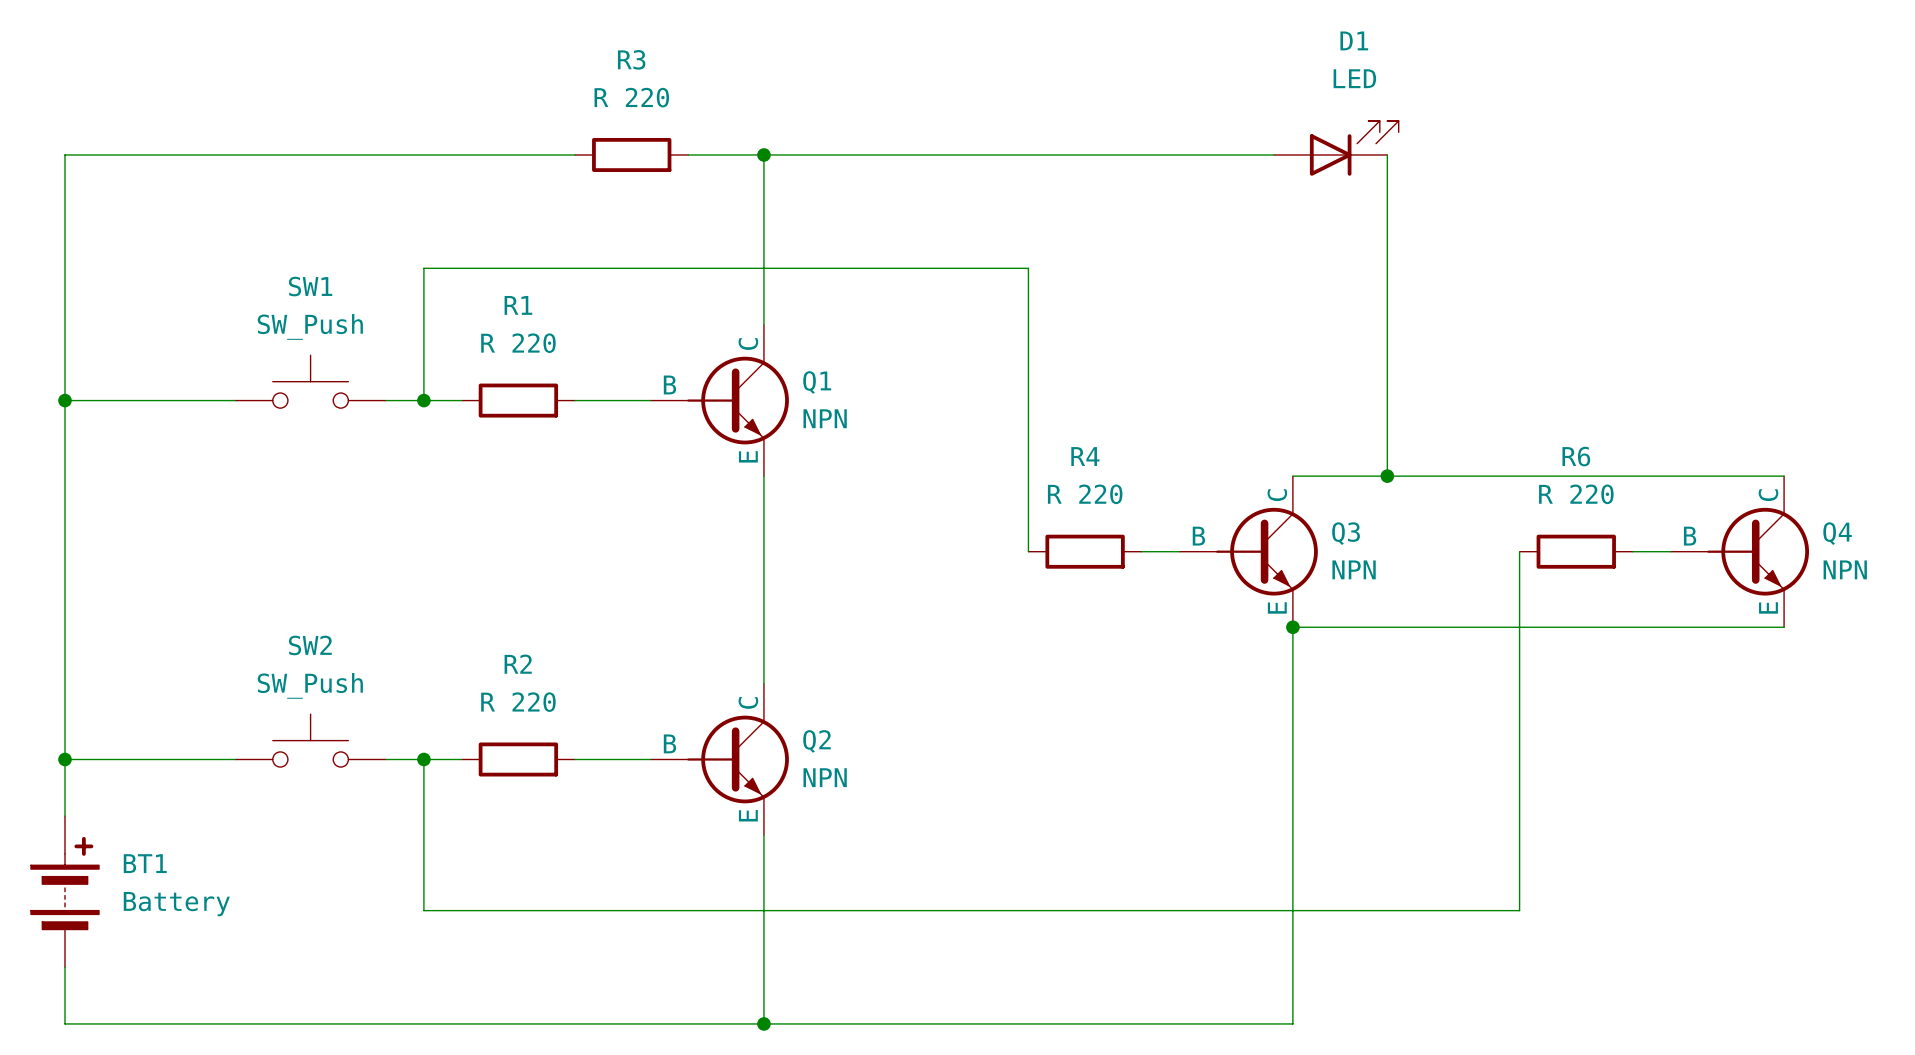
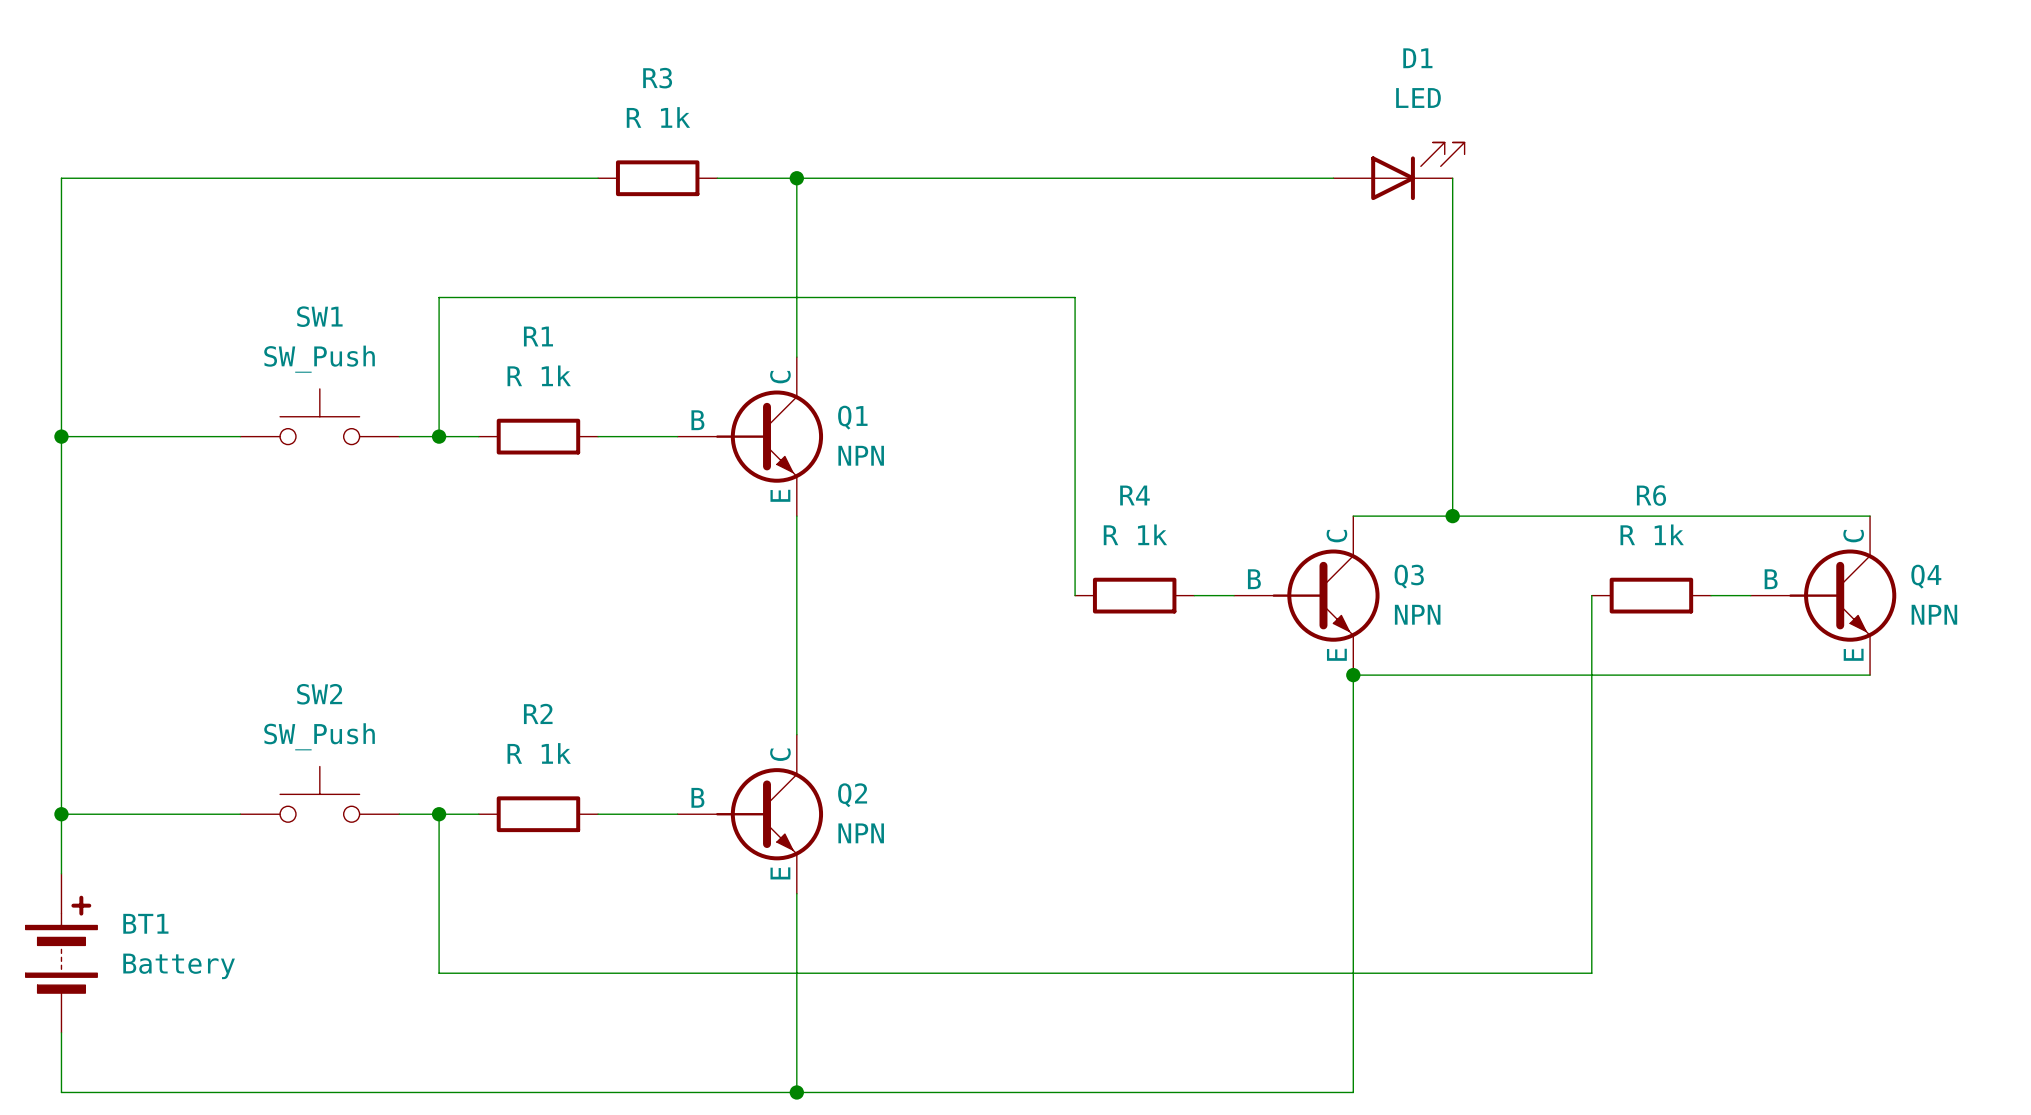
R3 value: R 220 (631, 97) -> R 1k (658, 117)
R1 value: R 220 (518, 343) -> R 1k (539, 375)
R4 value: R 220 (1085, 494) -> R 1k (1135, 534)
R6 value: R 220 (1576, 494) -> R 1k (1652, 534)
R2 value: R 220 (518, 702) -> R 1k (539, 753)

